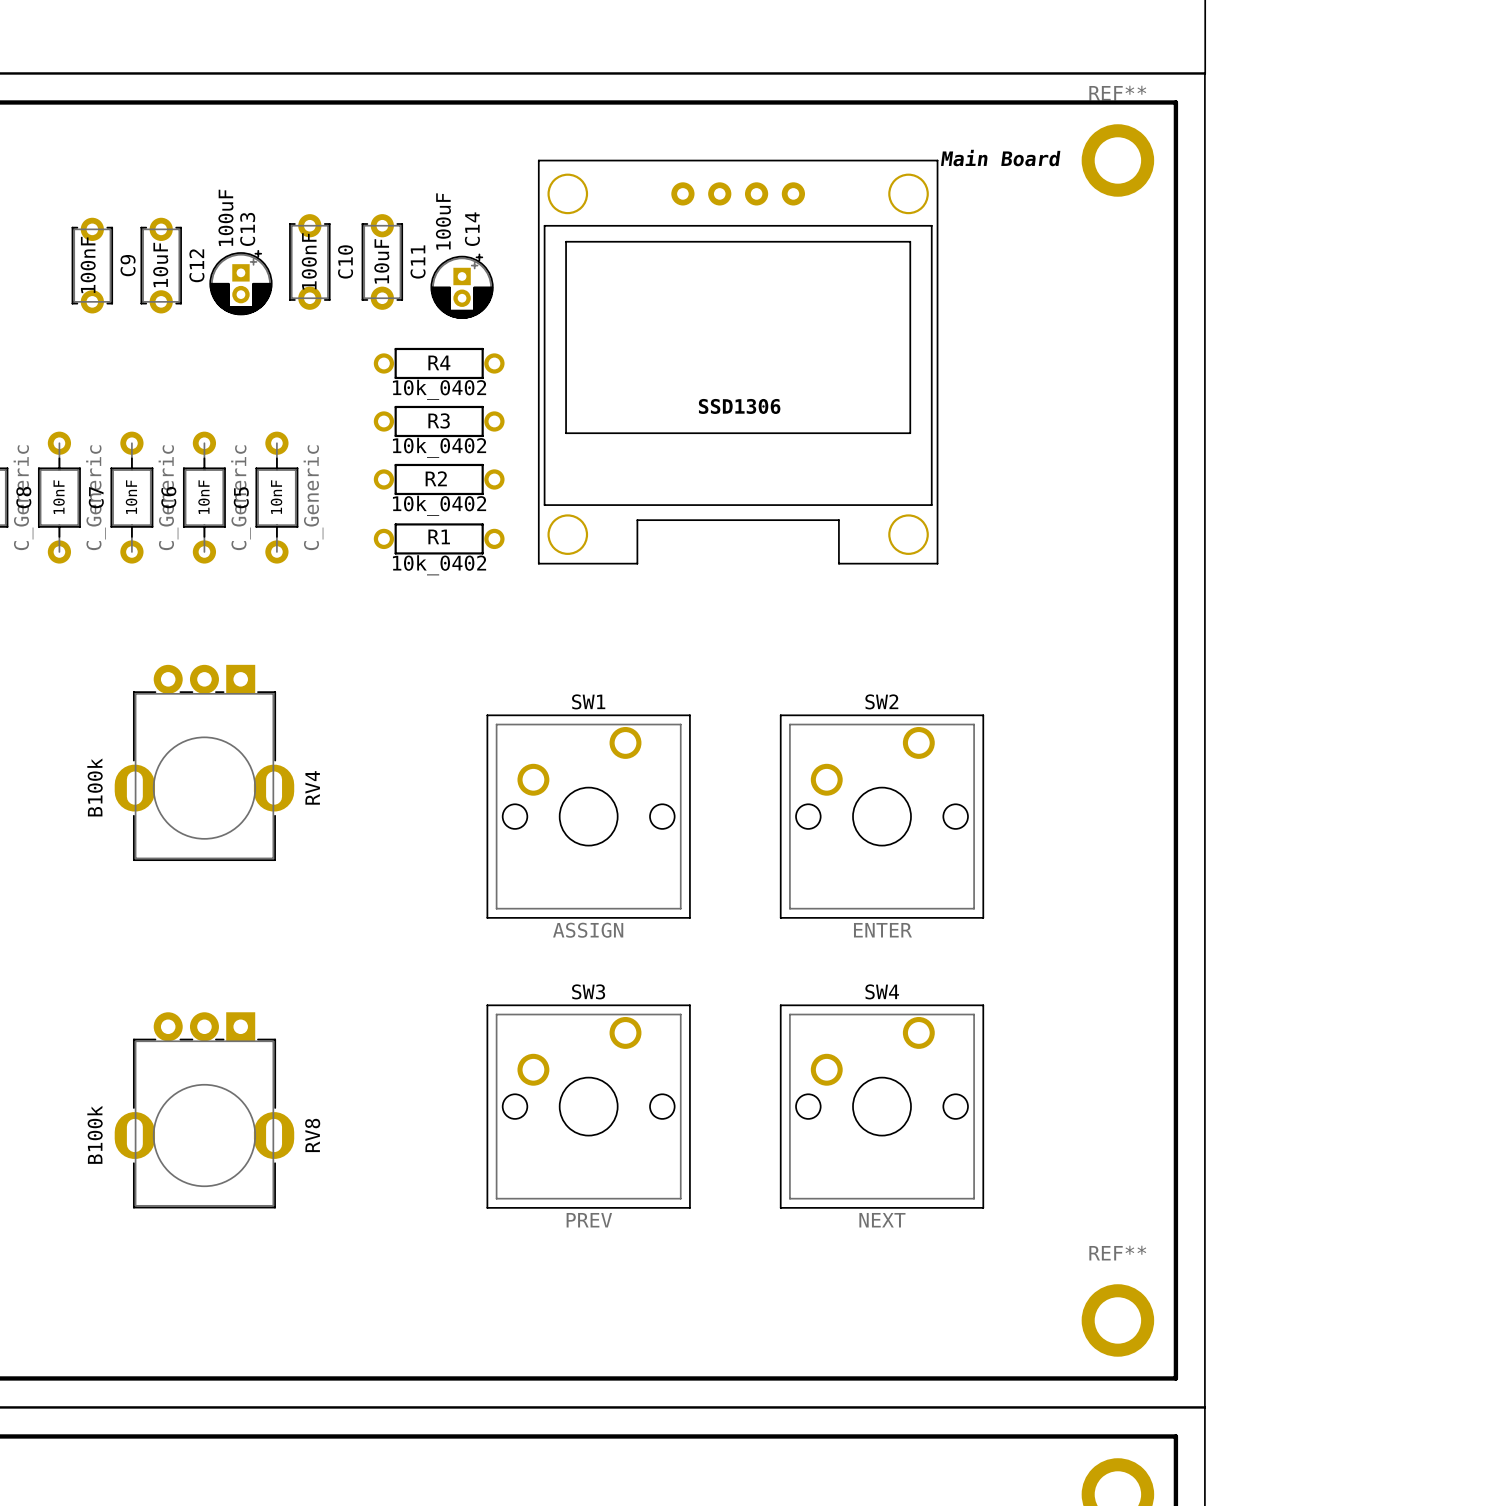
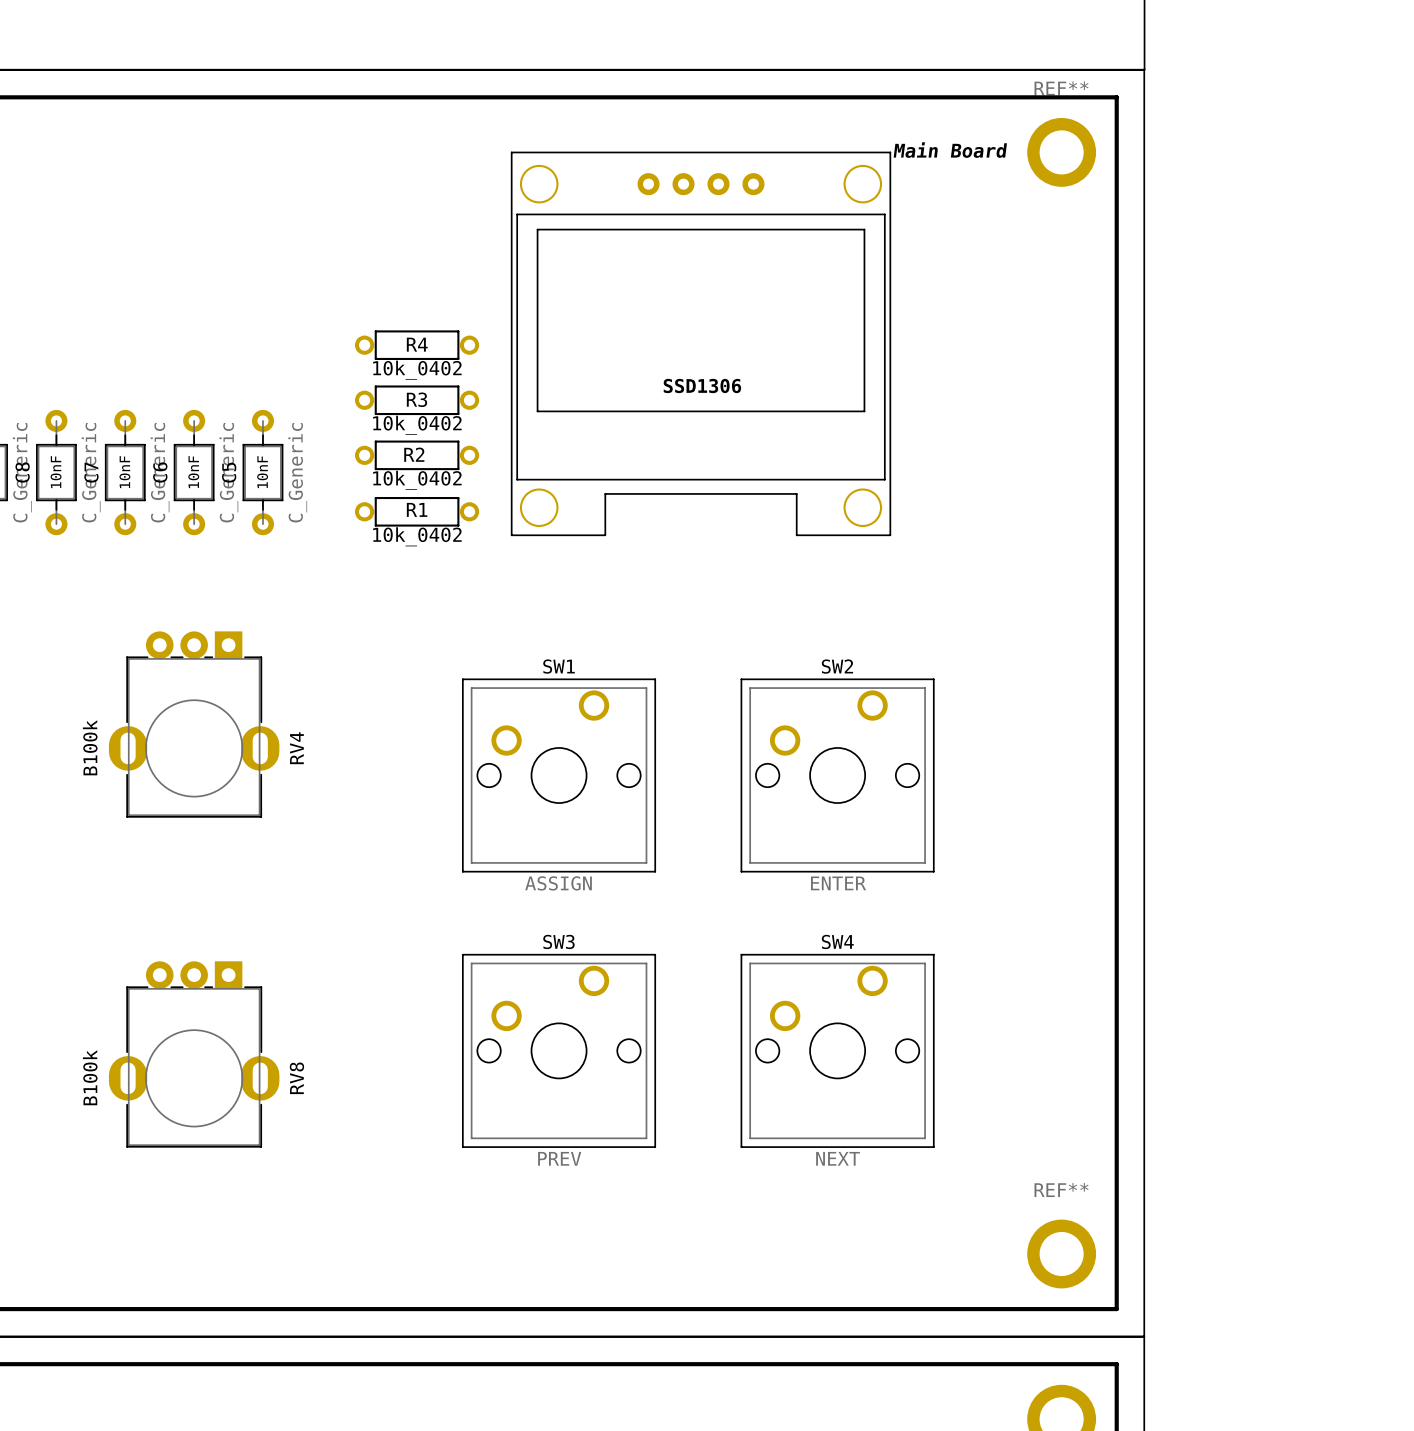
C10: 100nF (309, 261) -> none
C11: 10uF (382, 261) -> none
C9: 100nF (92, 265) -> none
C12: 10uF (161, 265) -> none
C13: 100uF (240, 282) -> none
C14: 100uF (462, 286) -> none

